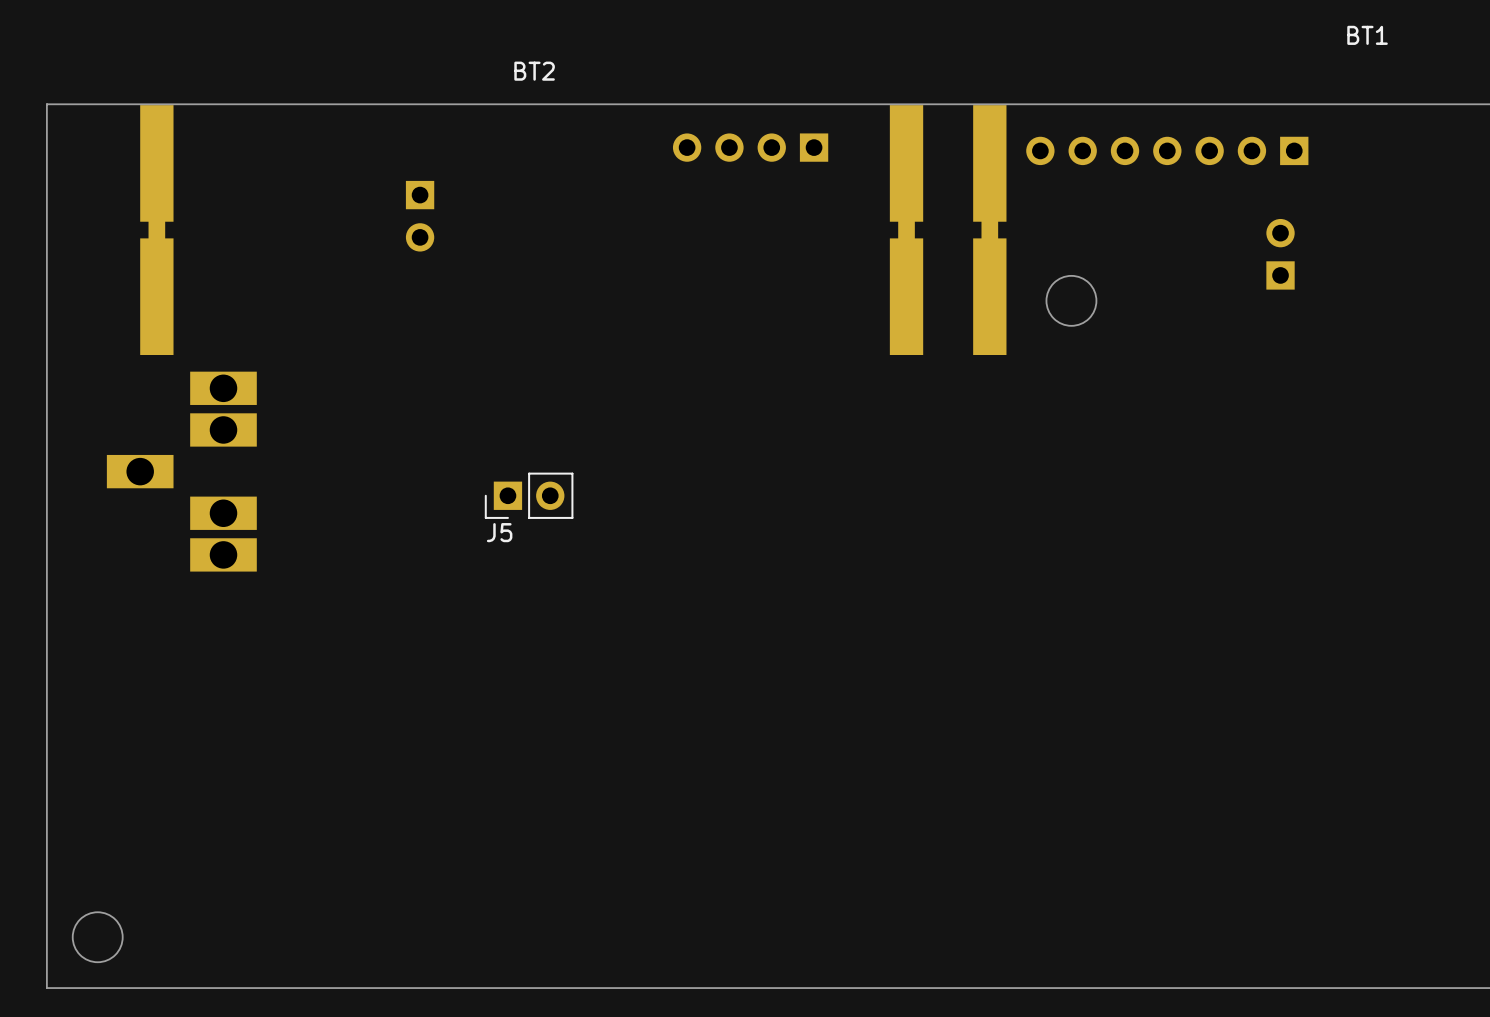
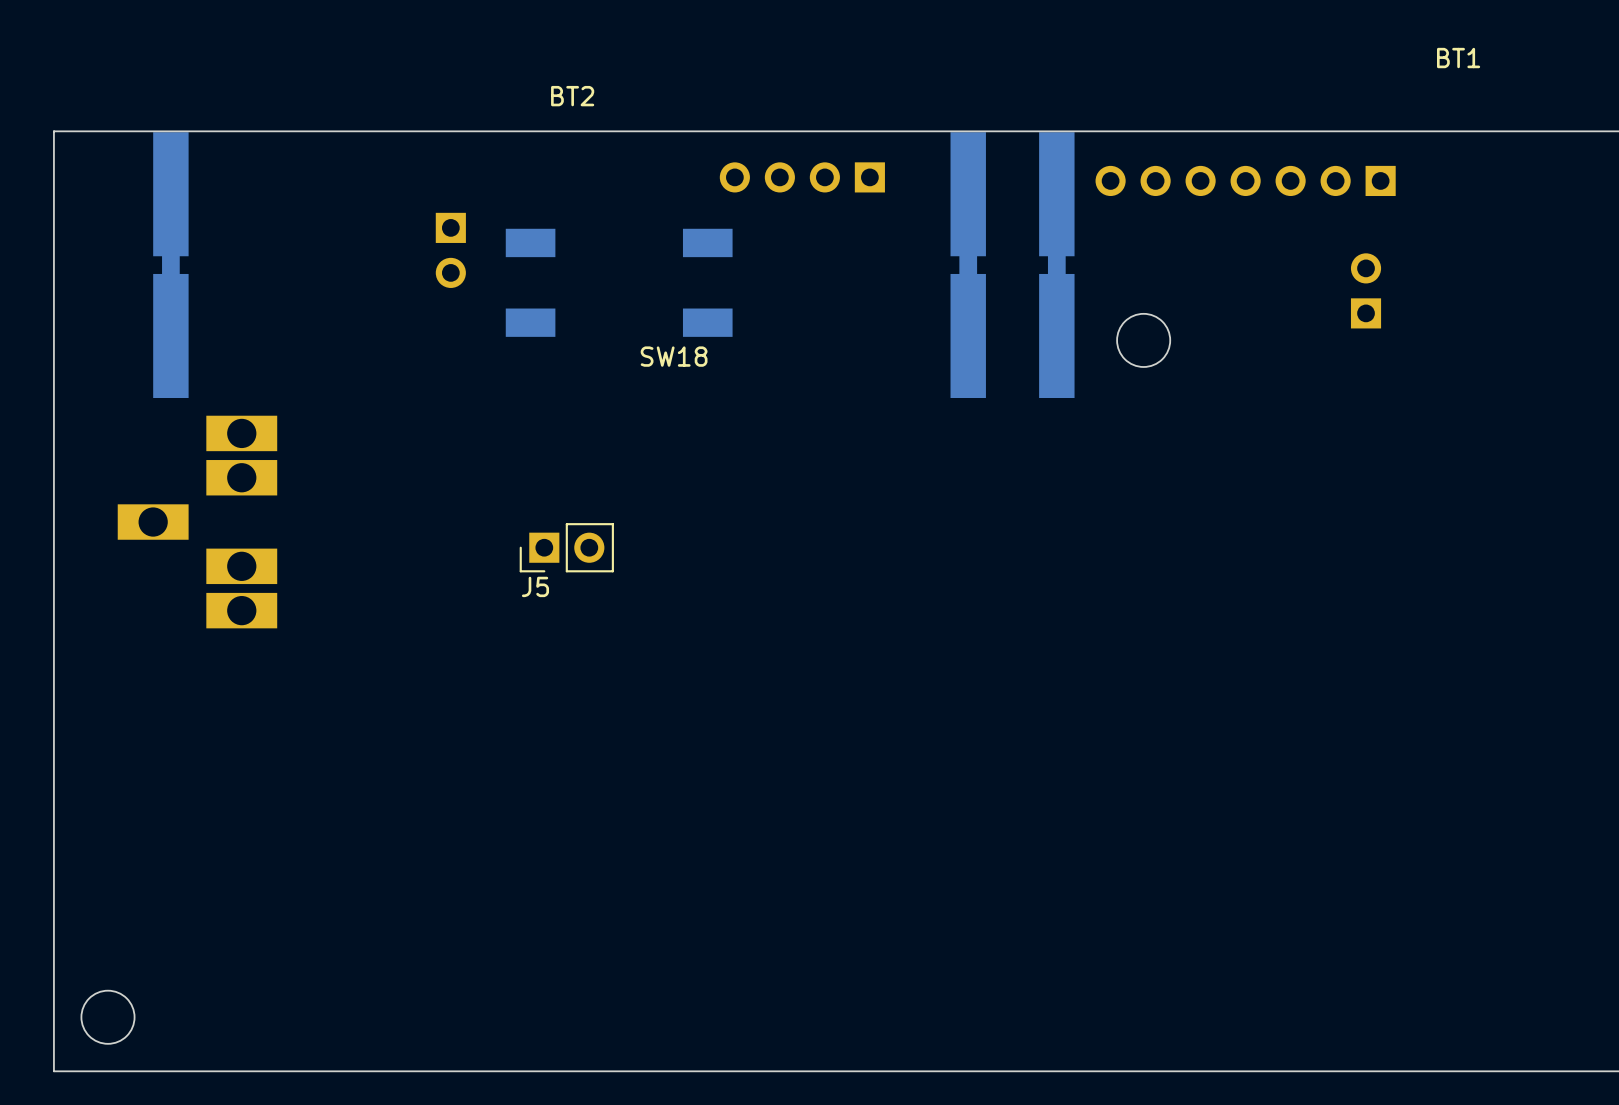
SW18: none -> (619, 282)

